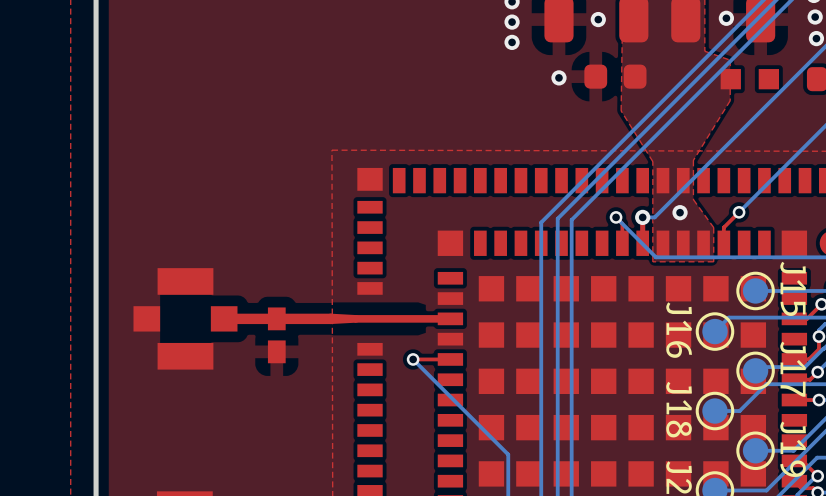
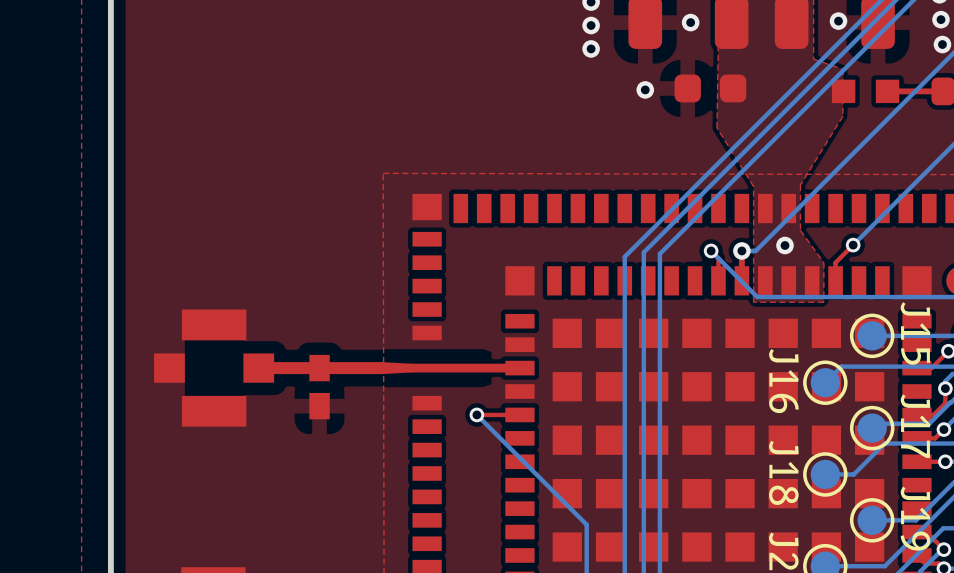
top track: none -> (943, 91) (887, 91)

